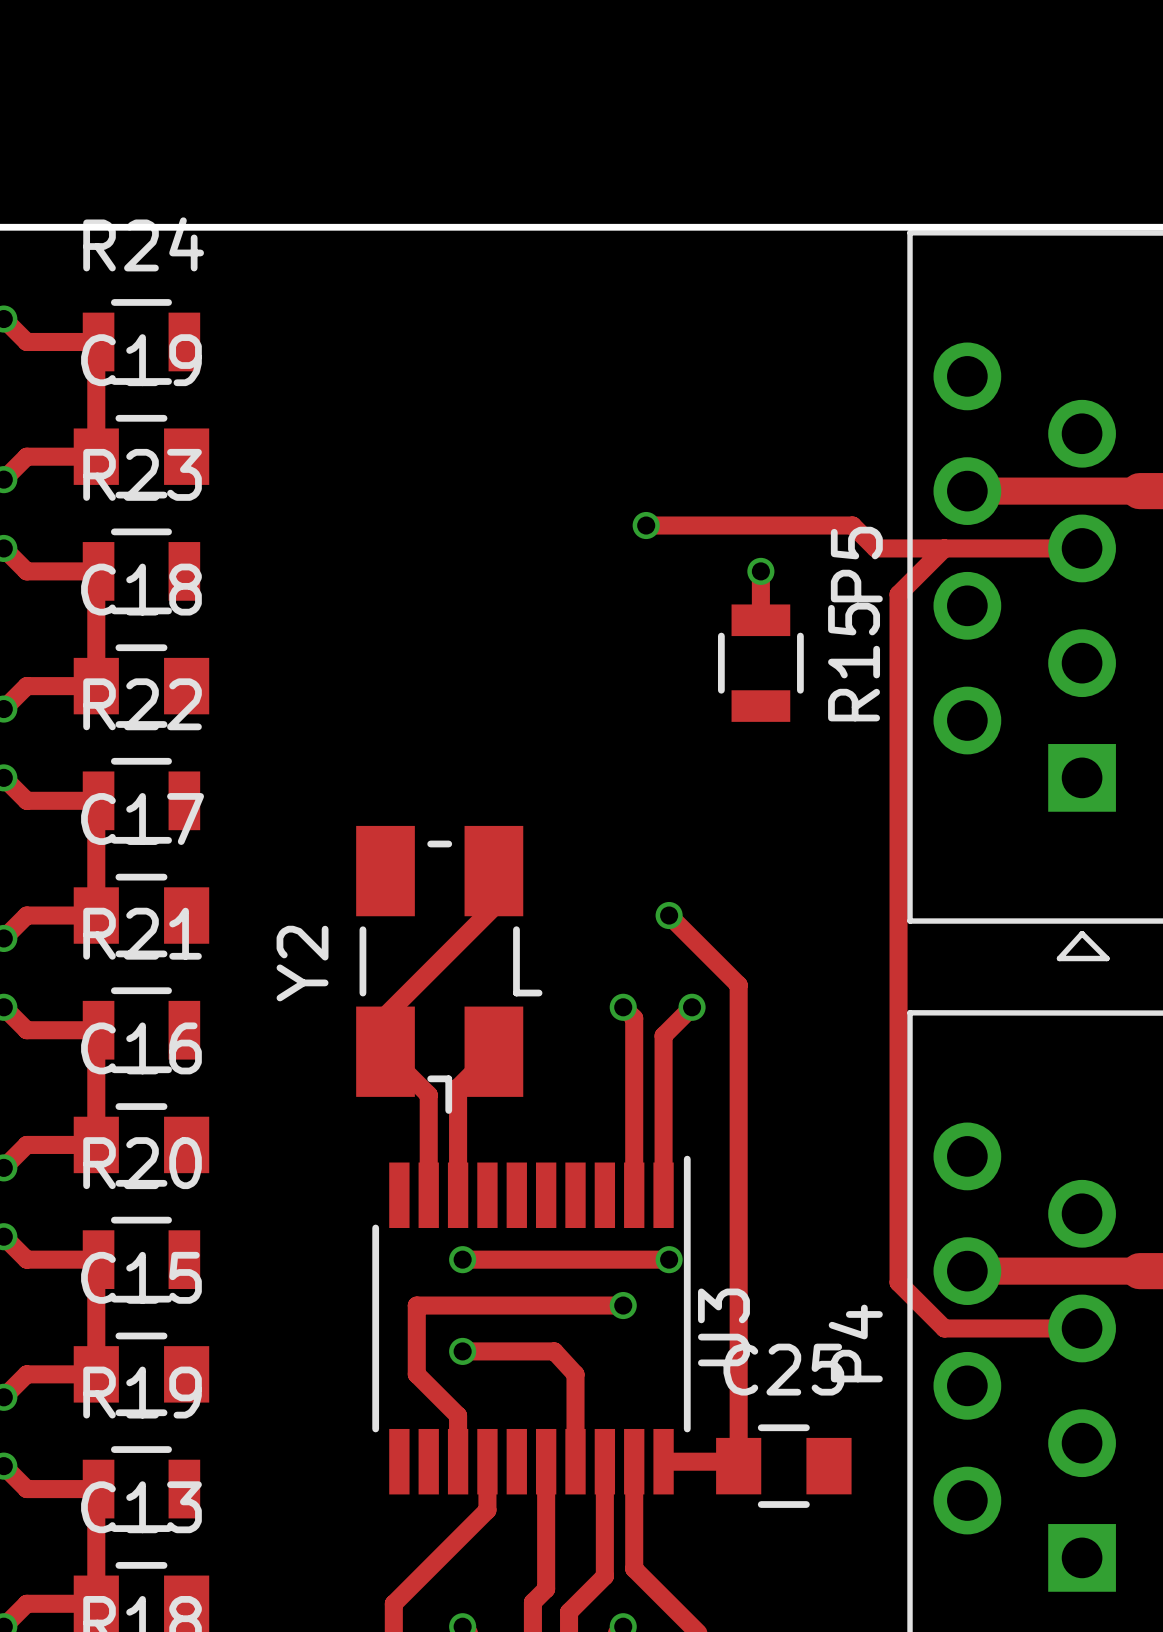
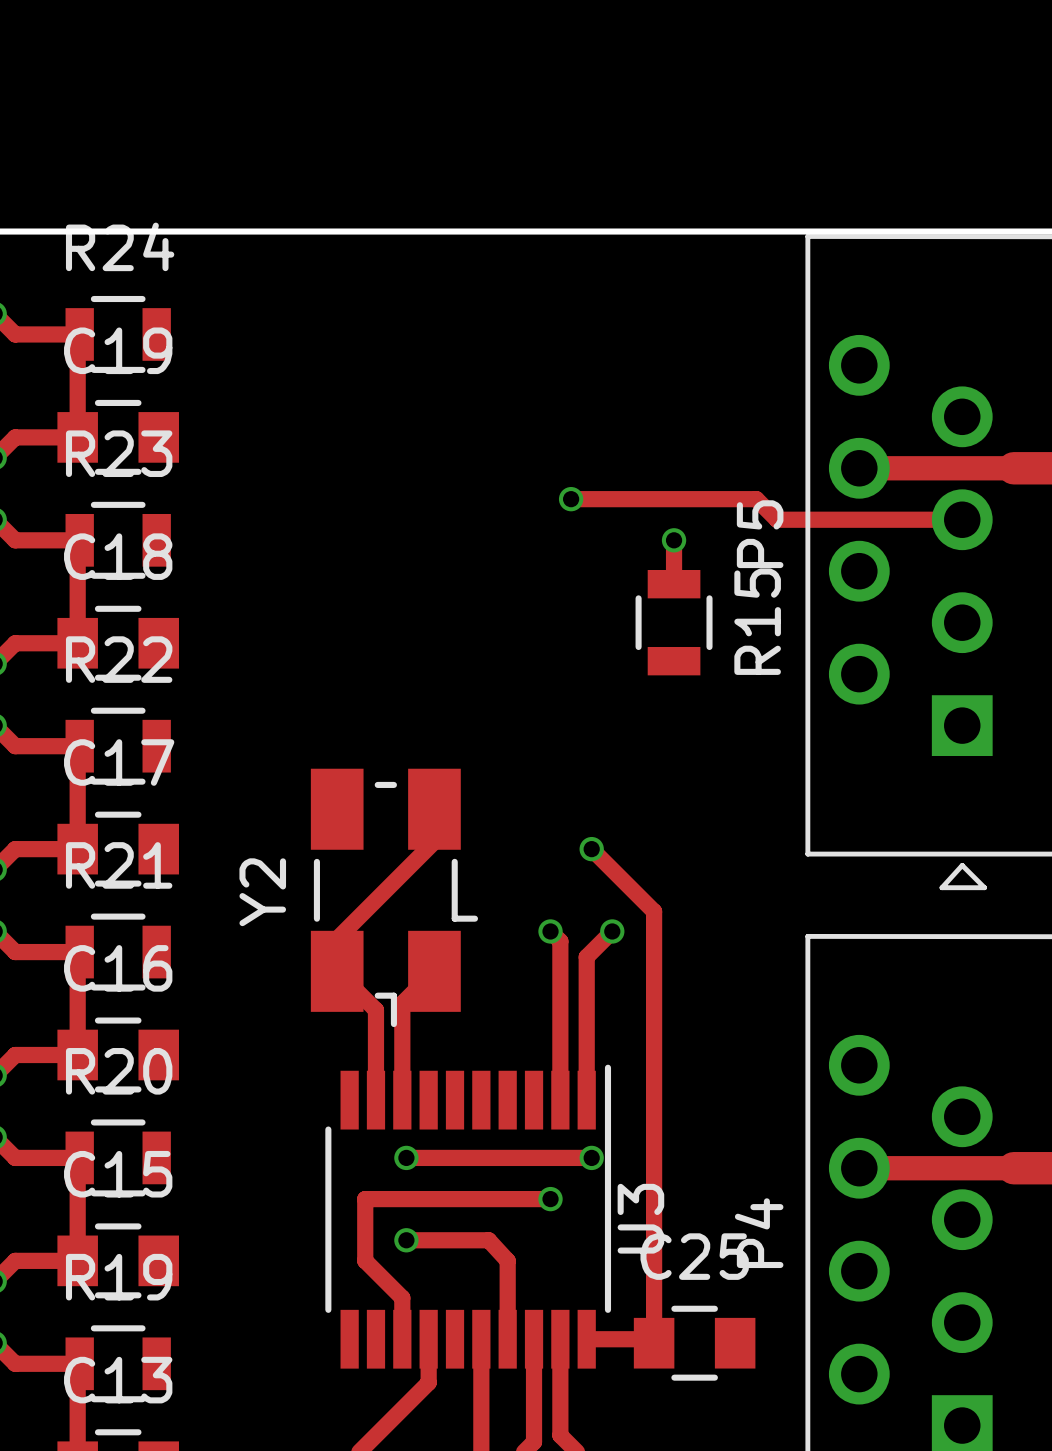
track: (944, 548) (898, 594) (898, 1282) (944, 1328) (1082, 1328) -> none

